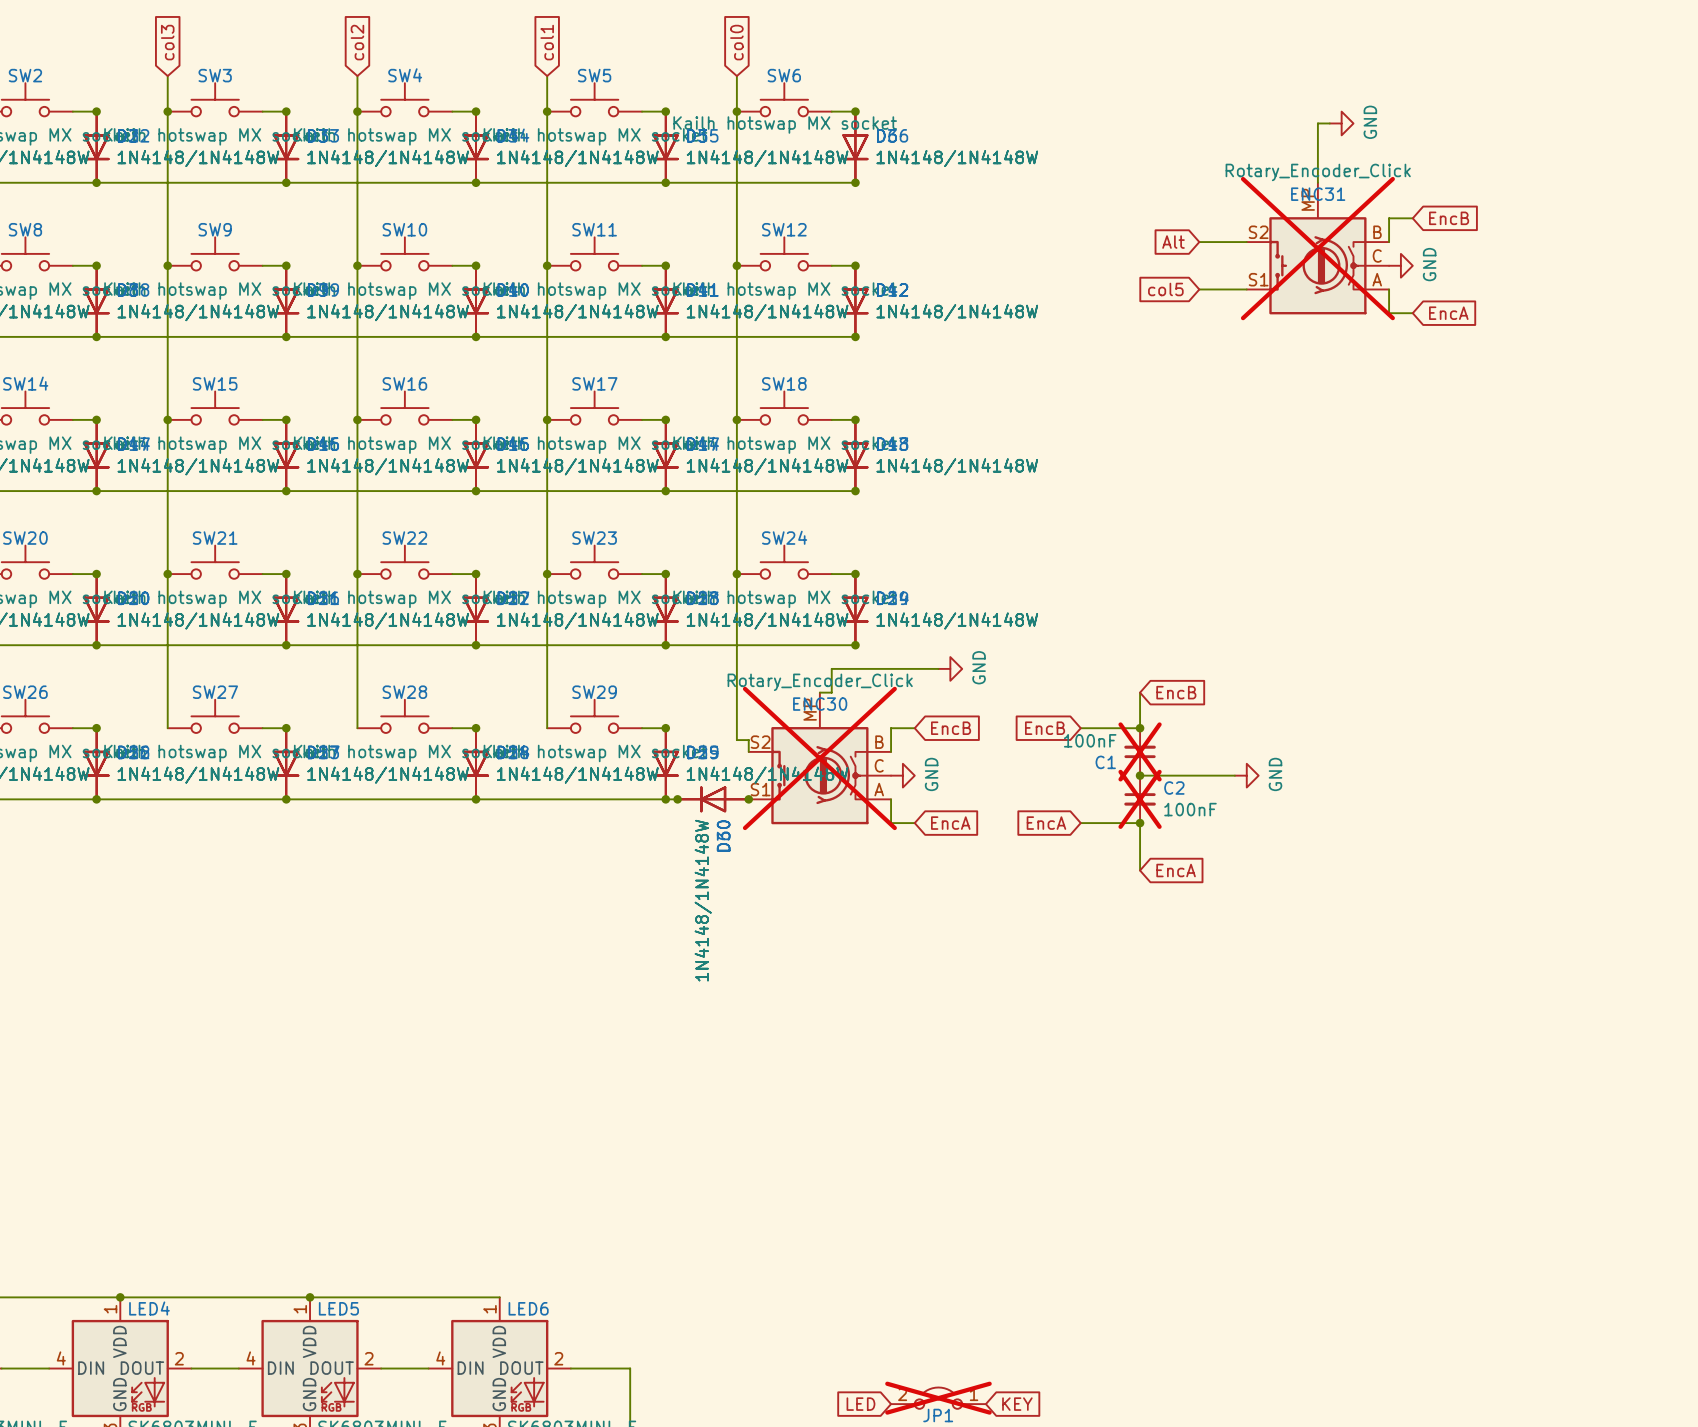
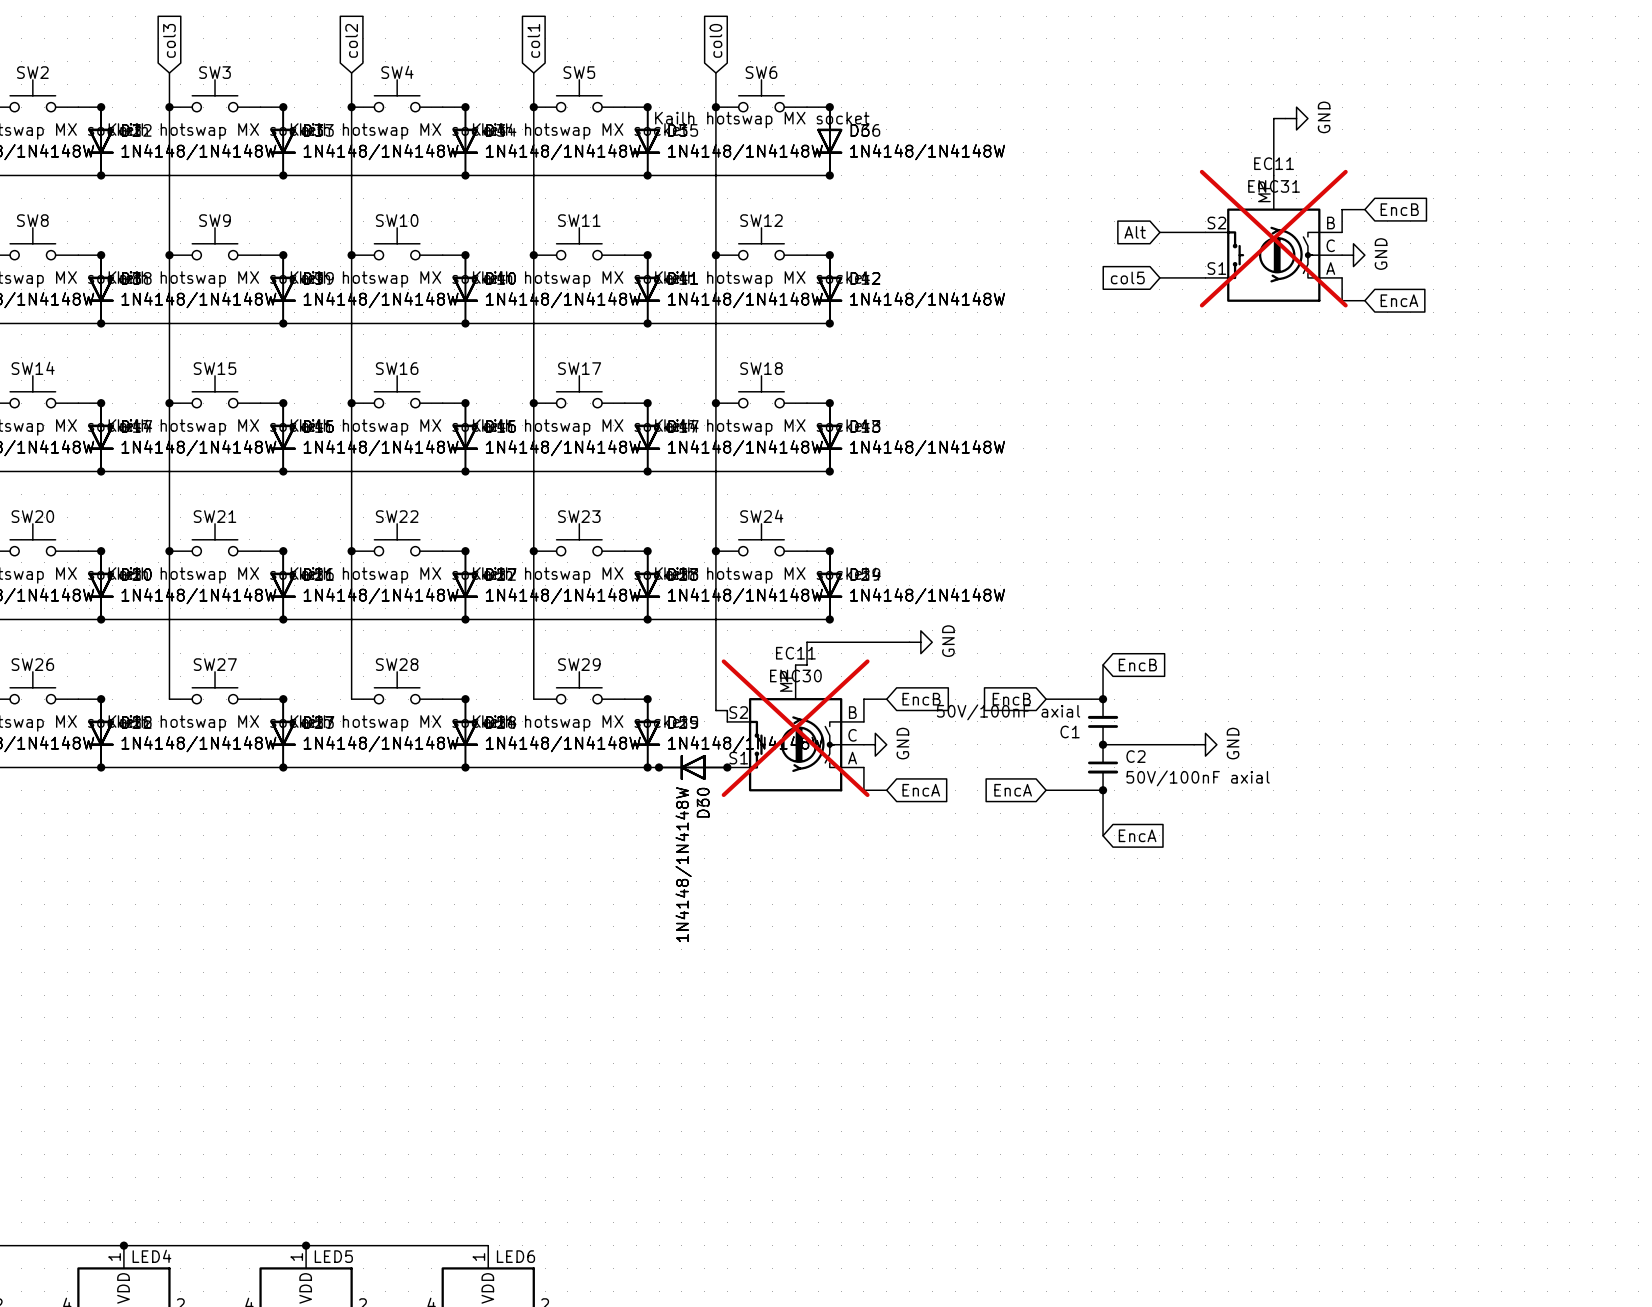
ENC31 value: Rotary_Encoder_Click (1318, 172) -> EC11 (1274, 163)
ENC30 value: Rotary_Encoder_Click (820, 682) -> EC11 (795, 653)
C1 value: 100nF (1090, 740) -> 50V/100nF axial (1008, 712)
C1 do-not-place cross: (1140, 751) -> none
C2 do-not-place cross: (1140, 799) -> none
C2 value: 100nF (1190, 809) -> 50V/100nF axial (1198, 778)

